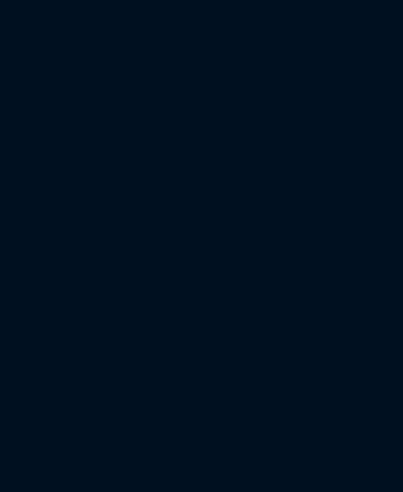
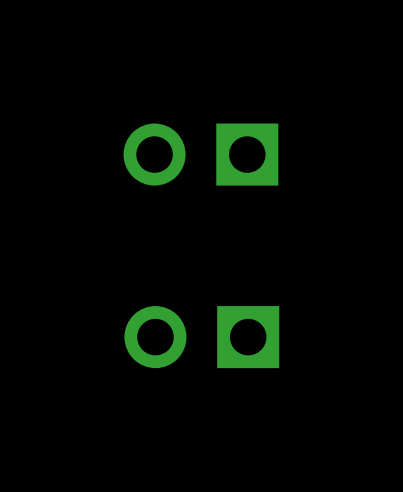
part: none -> (200, 154)
part: none -> (201, 337)

